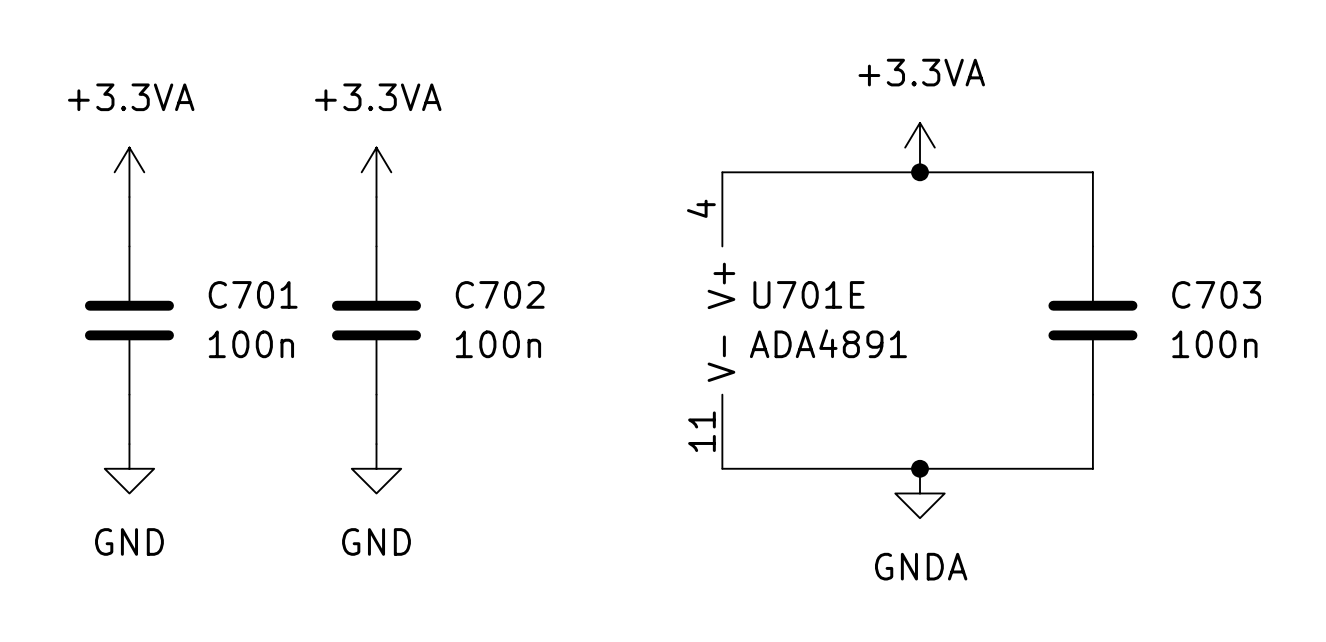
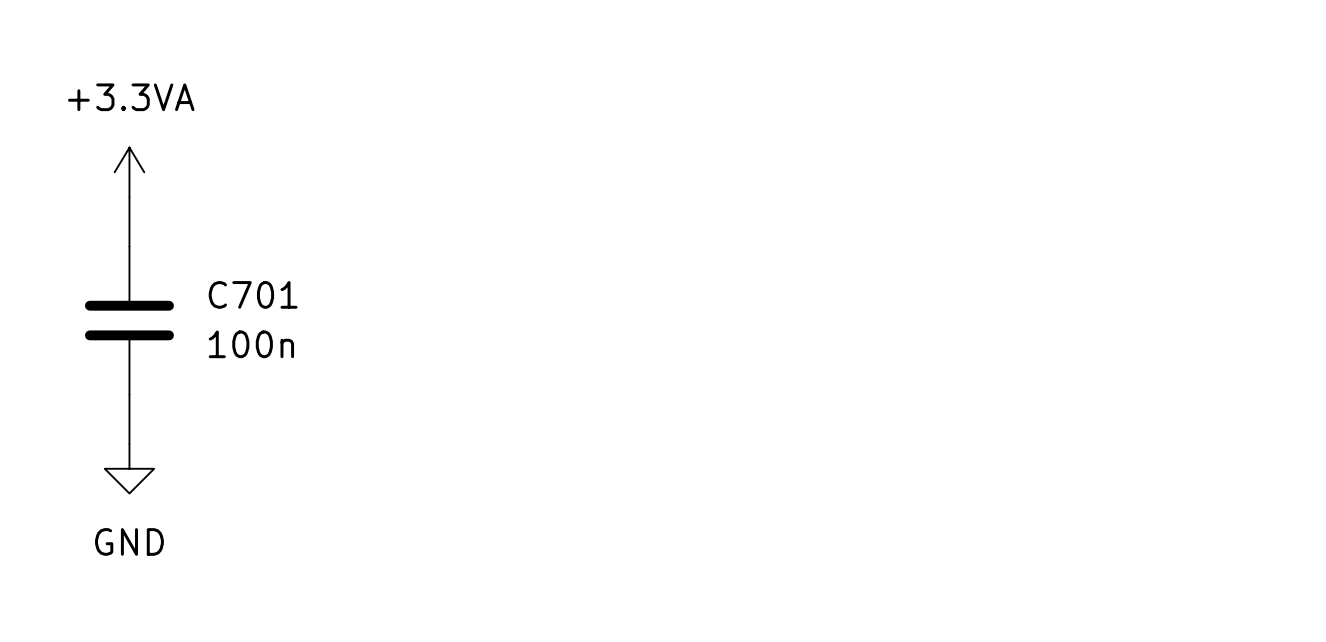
power symbol: +3.3VA (920, 147) -> none
power symbol: +3.3VA (376, 172) -> none
wire: (722, 172) (1092, 172) (1092, 246) -> none
junction: (920, 172) -> none
wire: (376, 197) (376, 246) -> none
C702: 100n (376, 320) -> none
U701E: ADA4891 (722, 320) -> none
C703: 100n (1092, 320) -> none
wire: (376, 394) (376, 444) -> none
wire: (1092, 394) (1092, 468) (722, 468) -> none
power symbol: GND (376, 468) -> none
junction: (920, 468) -> none
power symbol: GNDA (920, 493) -> none

